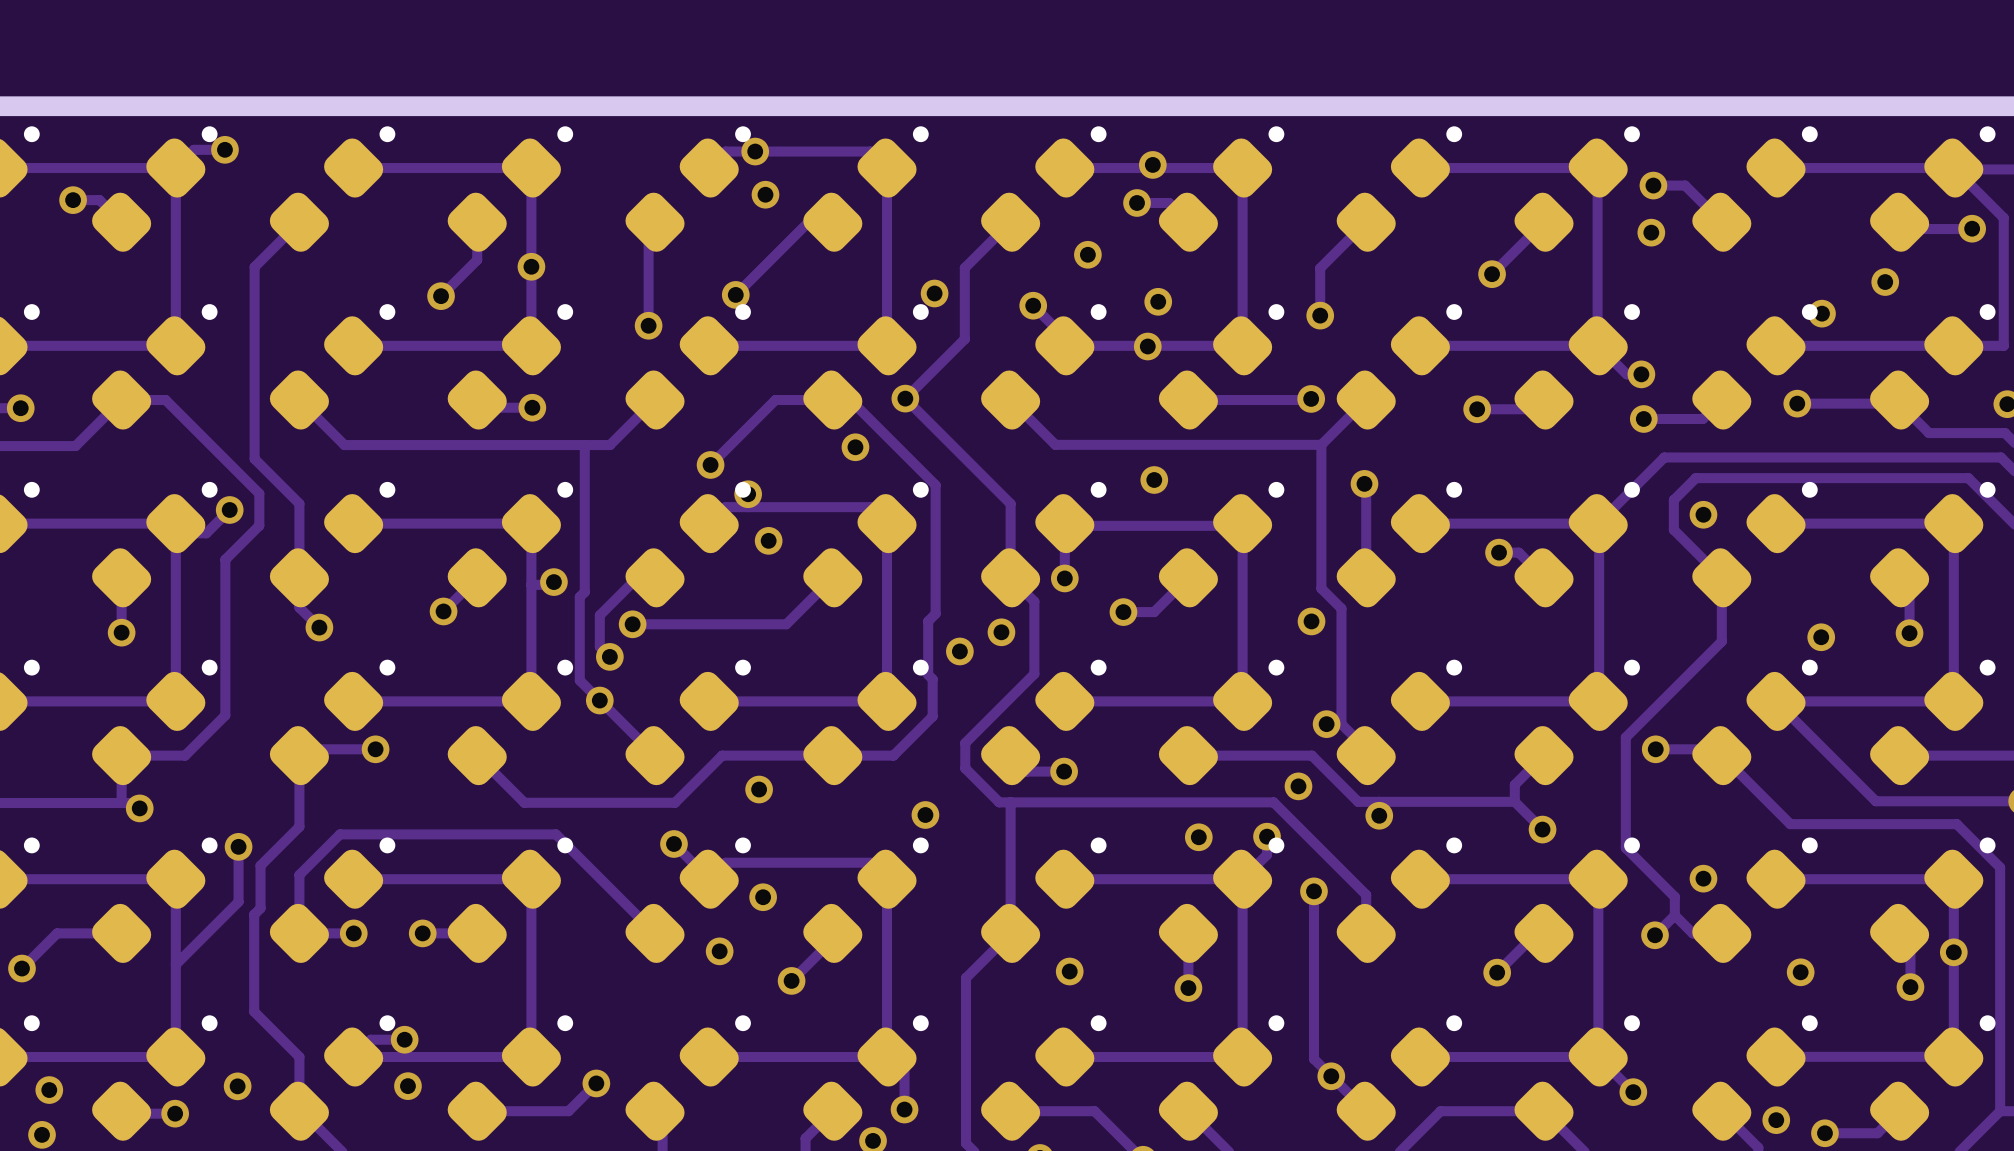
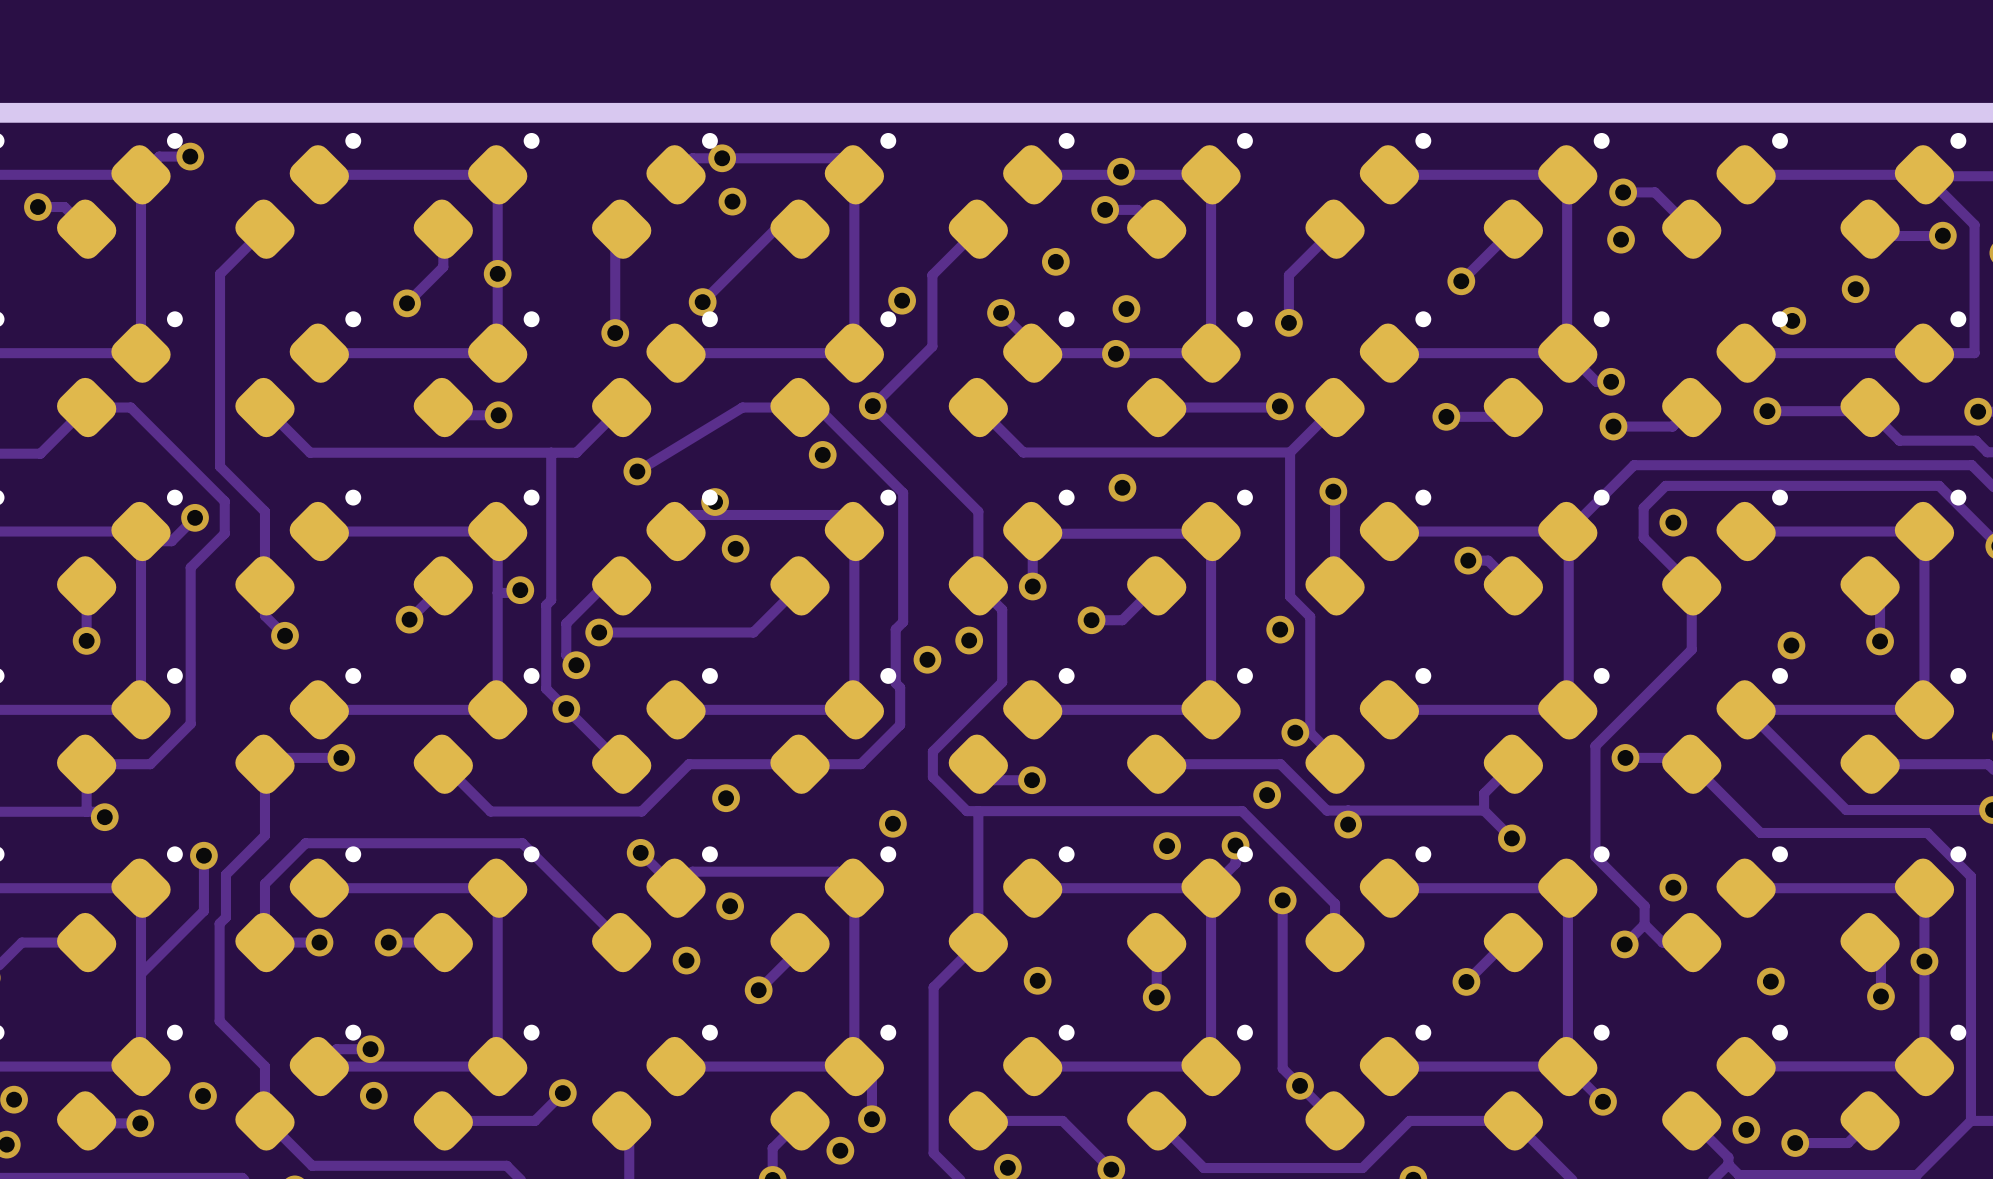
track: (775, 400) (710, 464) -> (742, 407) (637, 471)
via position: (710, 464) -> (637, 471)

